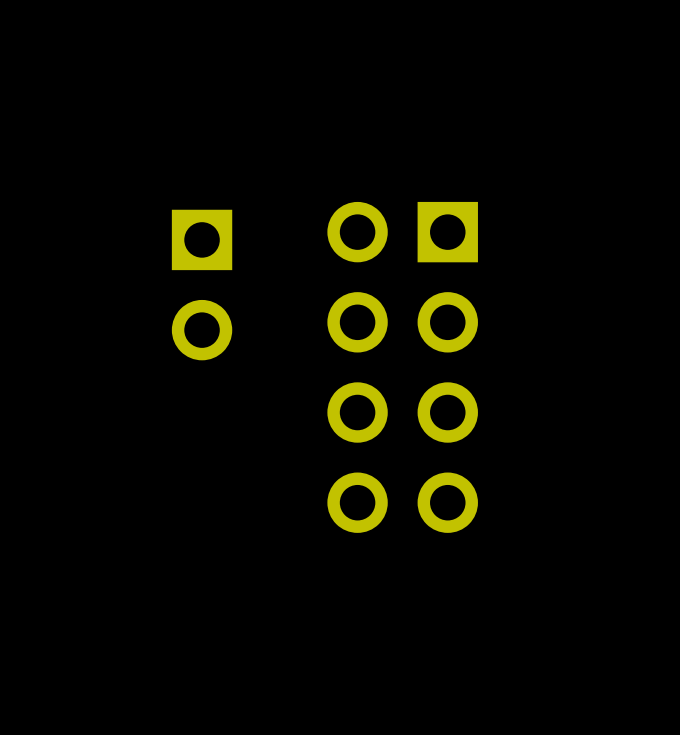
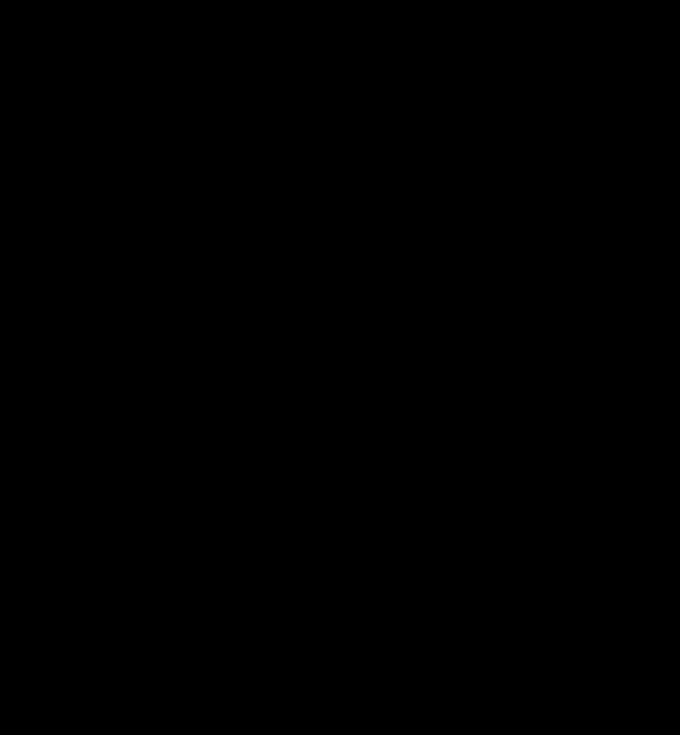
part: (202, 285) -> none
part: (402, 367) -> none

